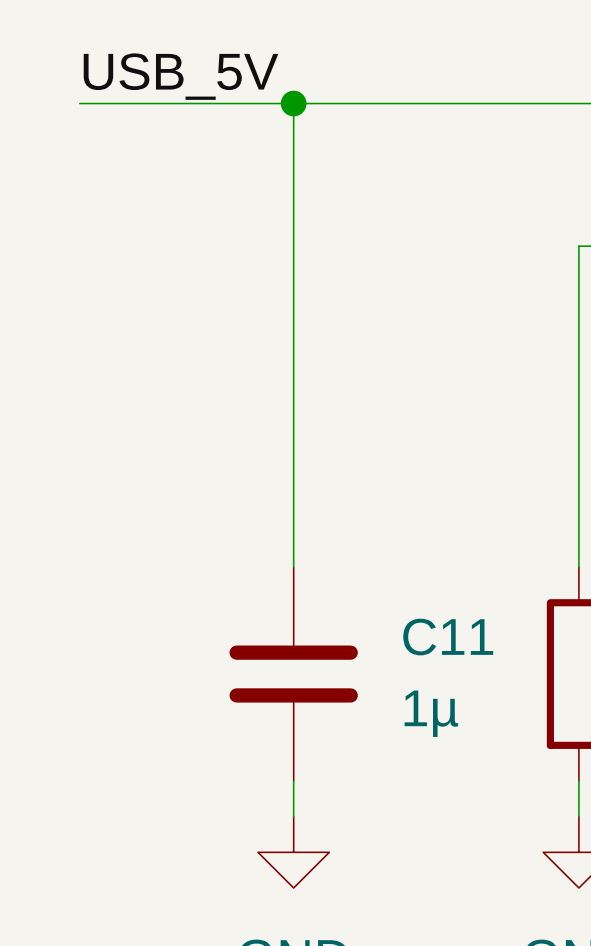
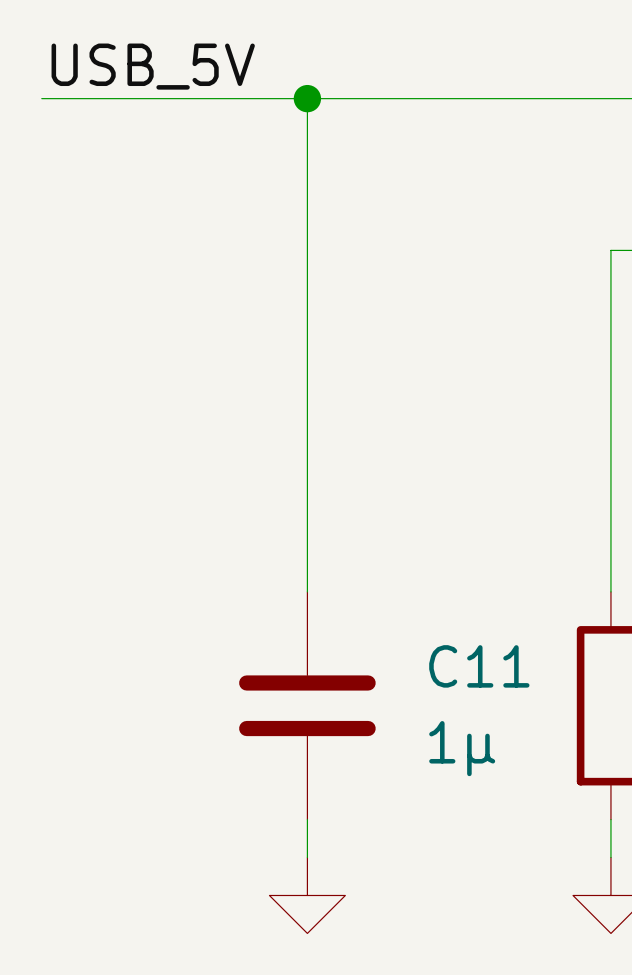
label position: USB_5V (181, 76) -> USB_5V (153, 66)
wire: none -> (41, 98) (79, 98)

